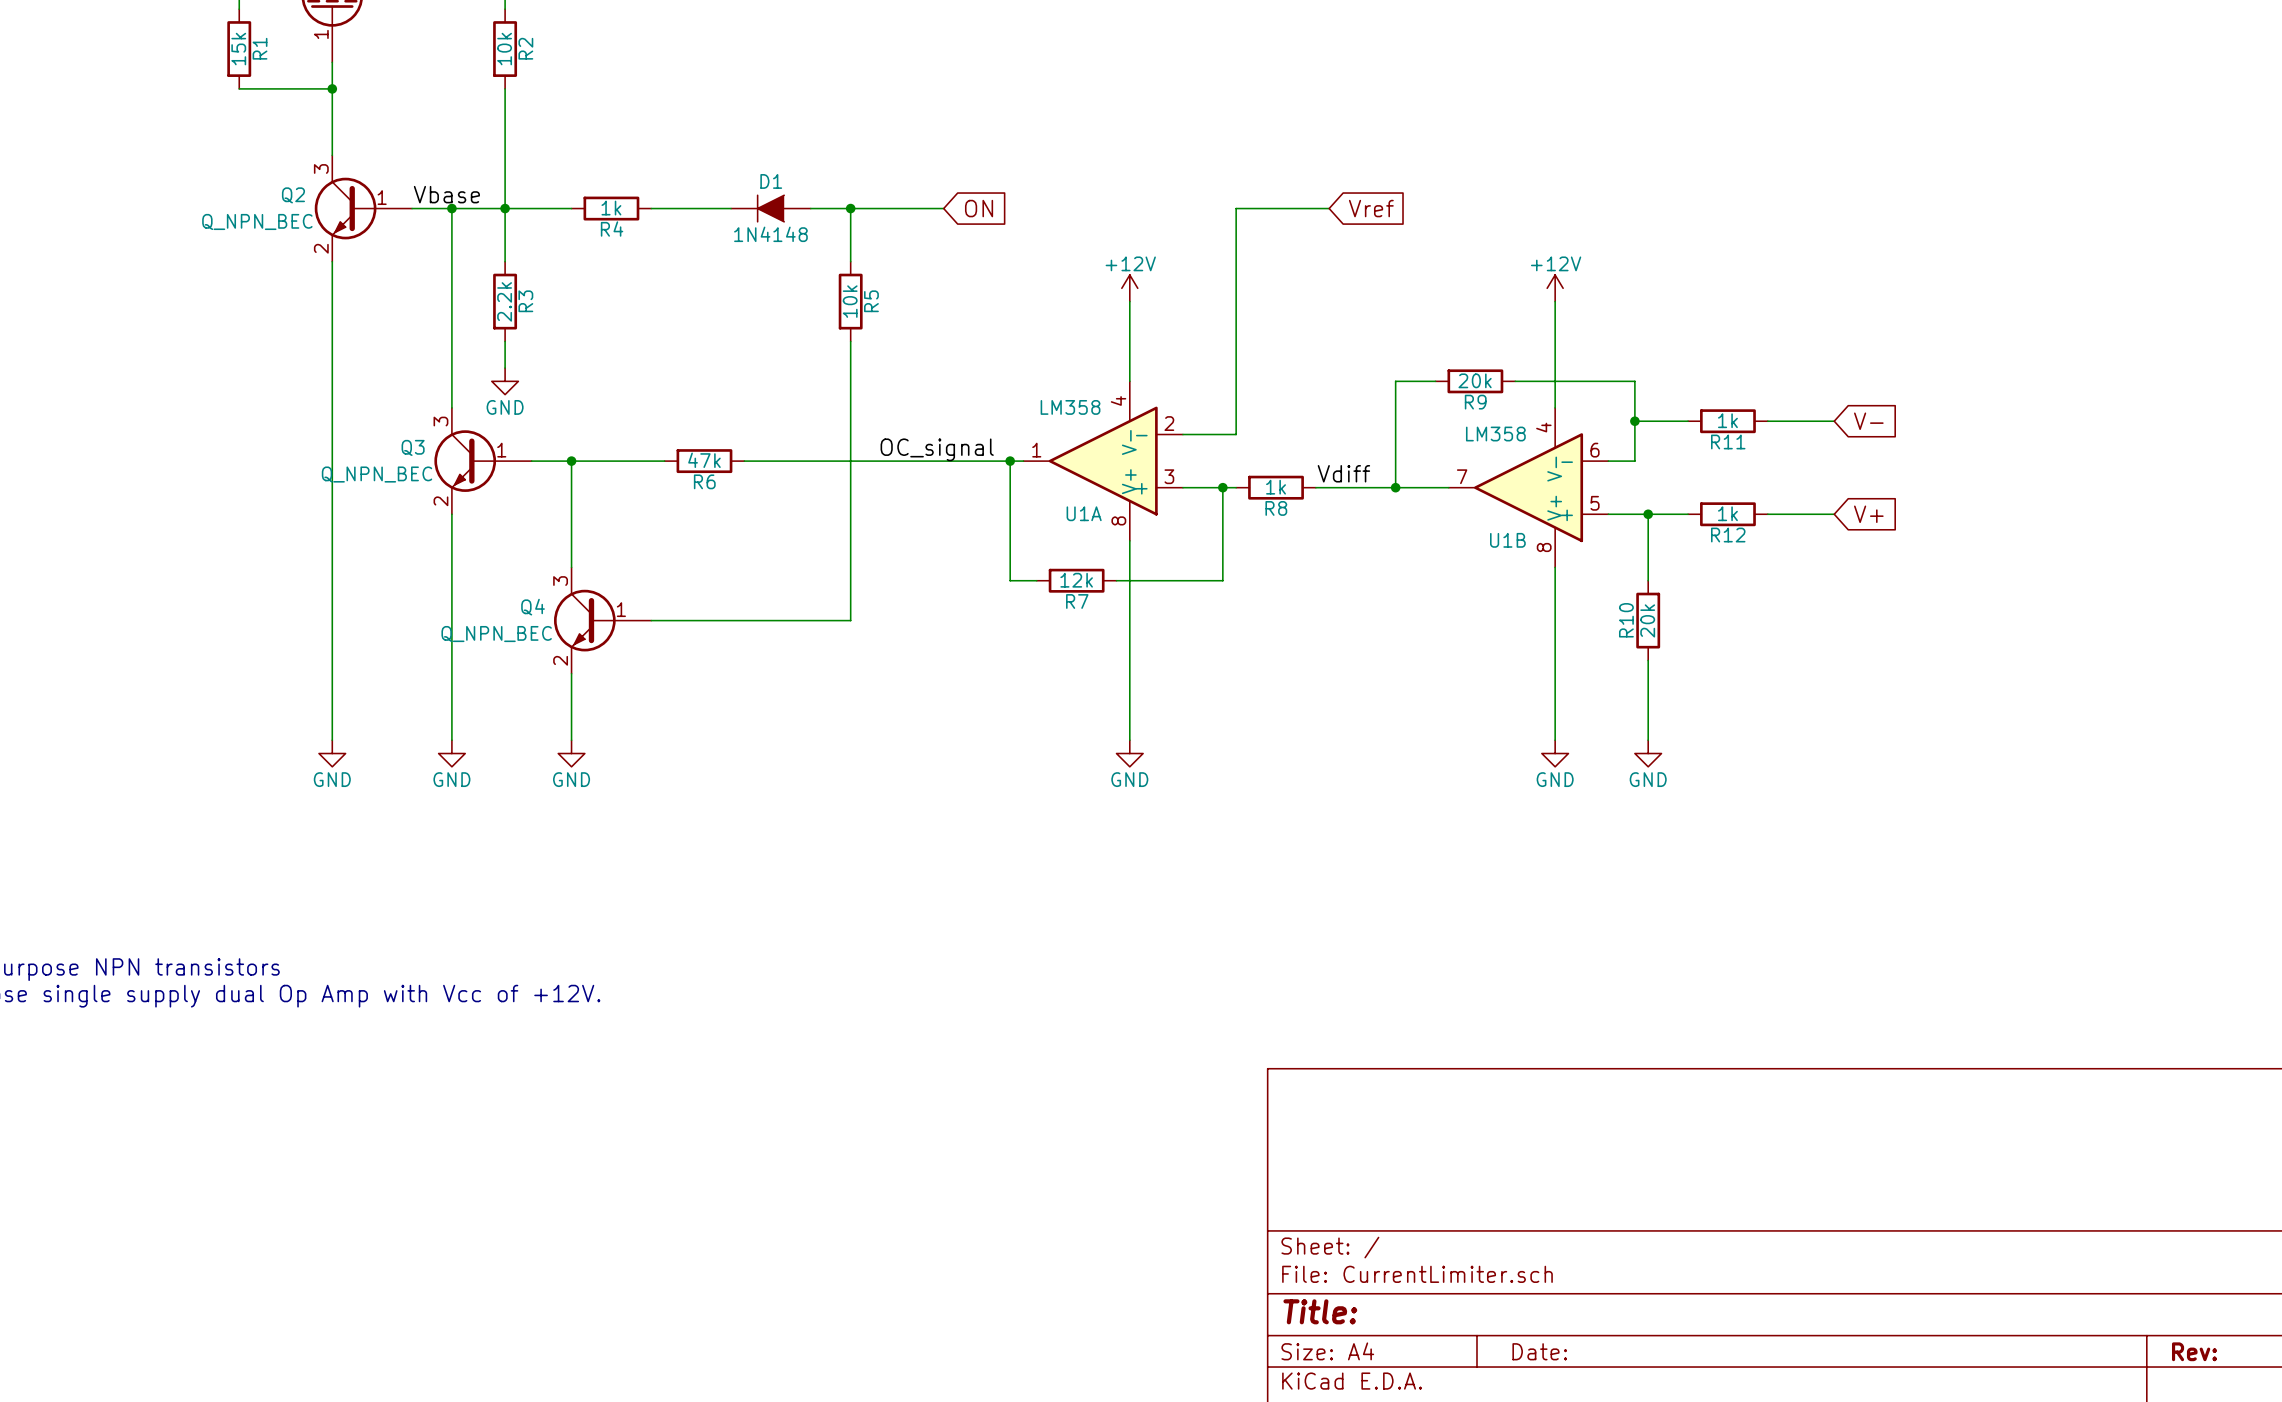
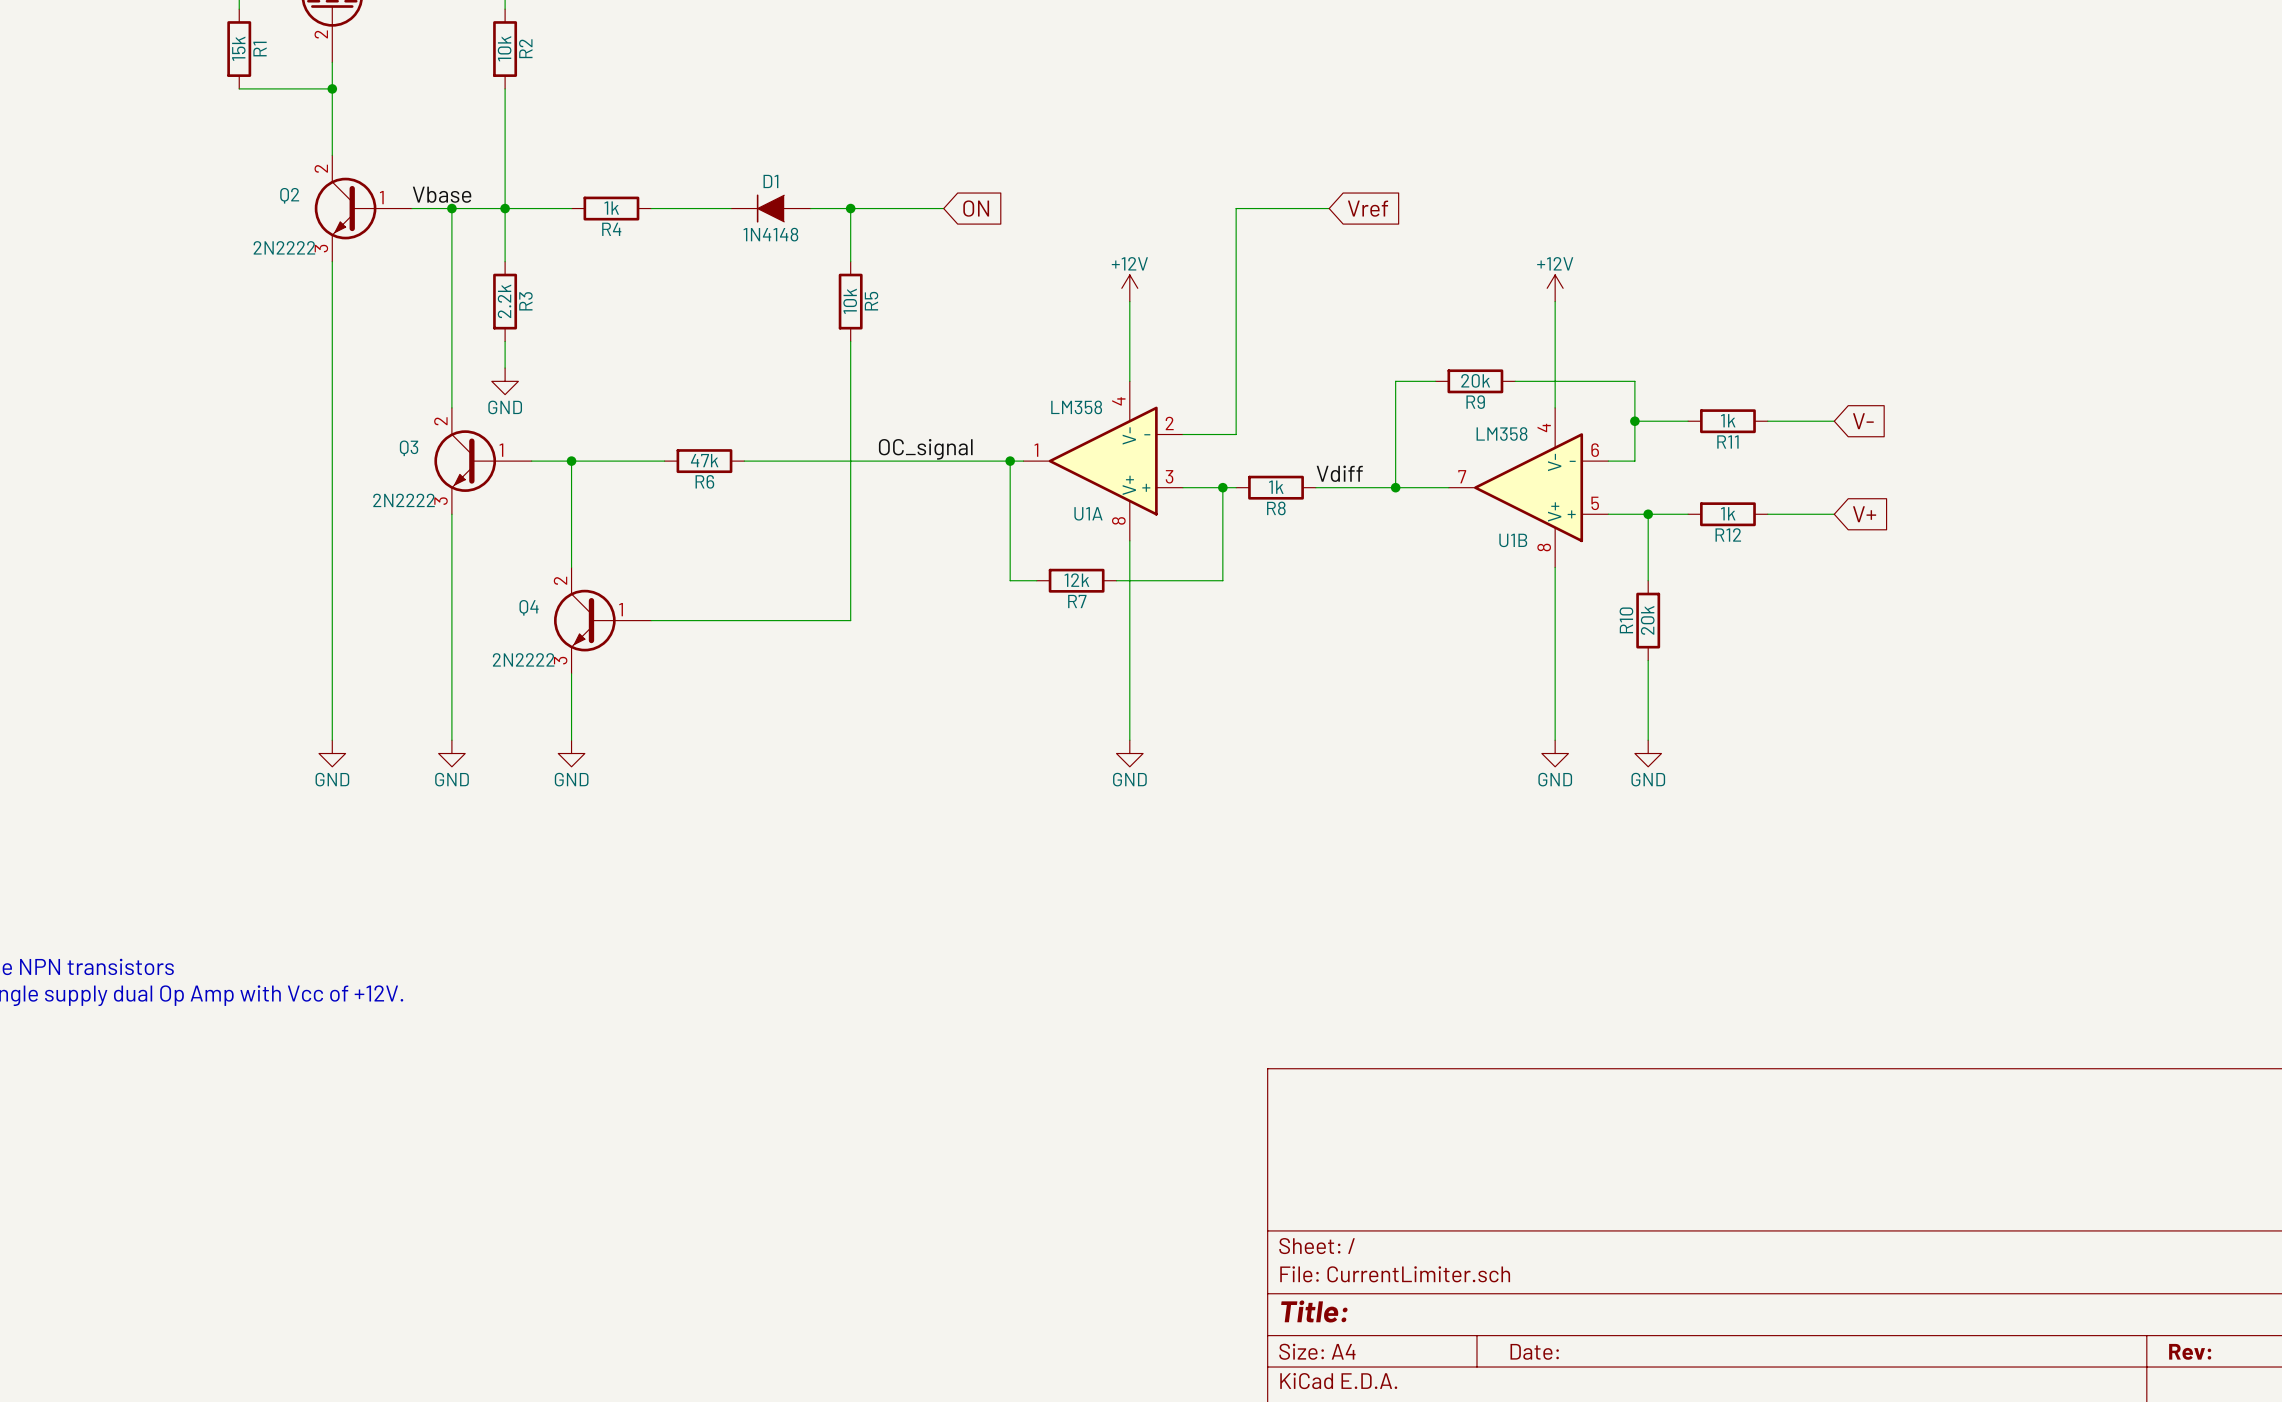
part pin number: 1 (321, 34) -> 2 (321, 34)
Q2 pin number: 3 (321, 168) -> 2 (321, 168)
Q2 value: Q_NPN_BEC (257, 221) -> 2N2222 (284, 247)
Q2 pin number: 2 (321, 248) -> 3 (321, 248)
Q3 pin number: 3 (440, 421) -> 2 (440, 421)
Q3 value: Q_NPN_BEC (377, 474) -> 2N2222 (404, 500)
Q3 pin number: 2 (440, 501) -> 3 (441, 501)
Q4 pin number: 3 (560, 581) -> 2 (560, 580)
Q4 value: Q_NPN_BEC (496, 634) -> 2N2222 (523, 659)
Q4 pin number: 2 (560, 660) -> 3 (560, 660)

